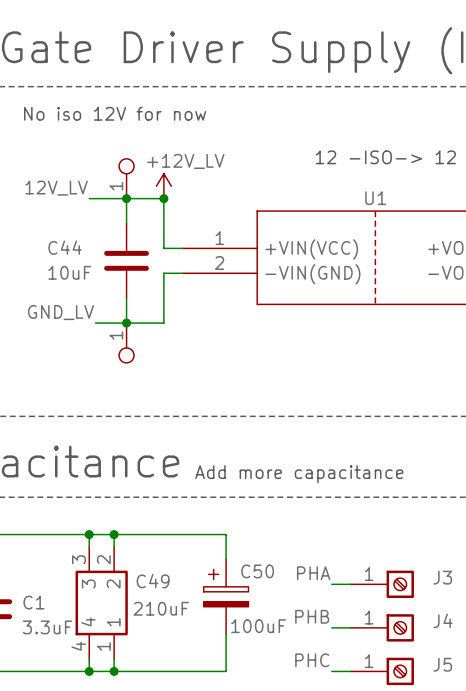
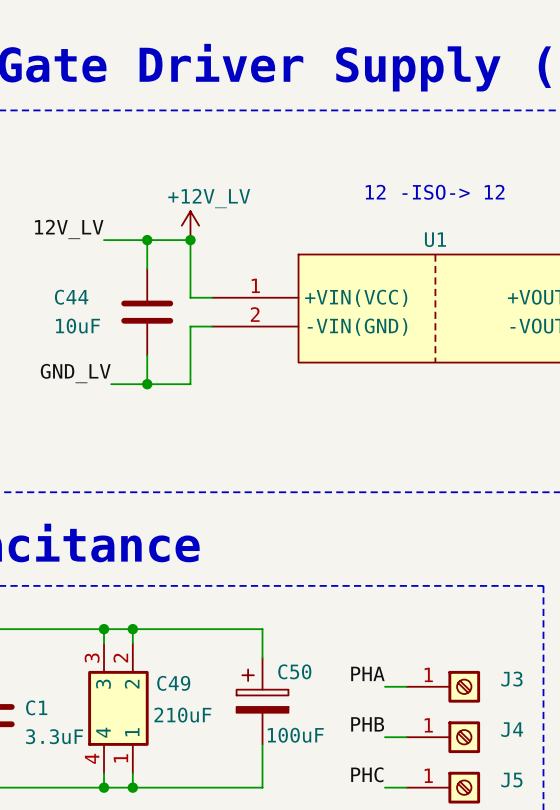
text: No iso 12V for now (115, 113) -> none
part: (126, 178) -> none
part: (126, 342) -> none
text: Add more capacitance (299, 474) -> none

